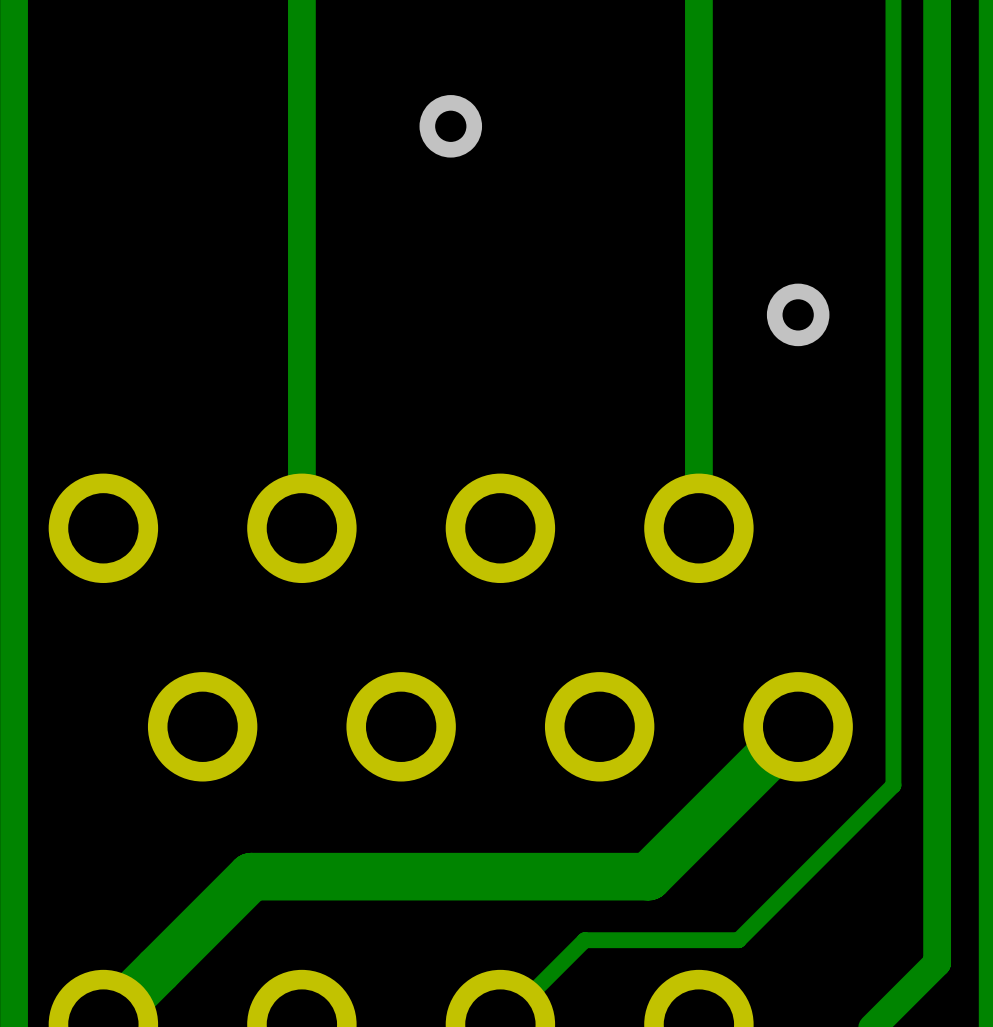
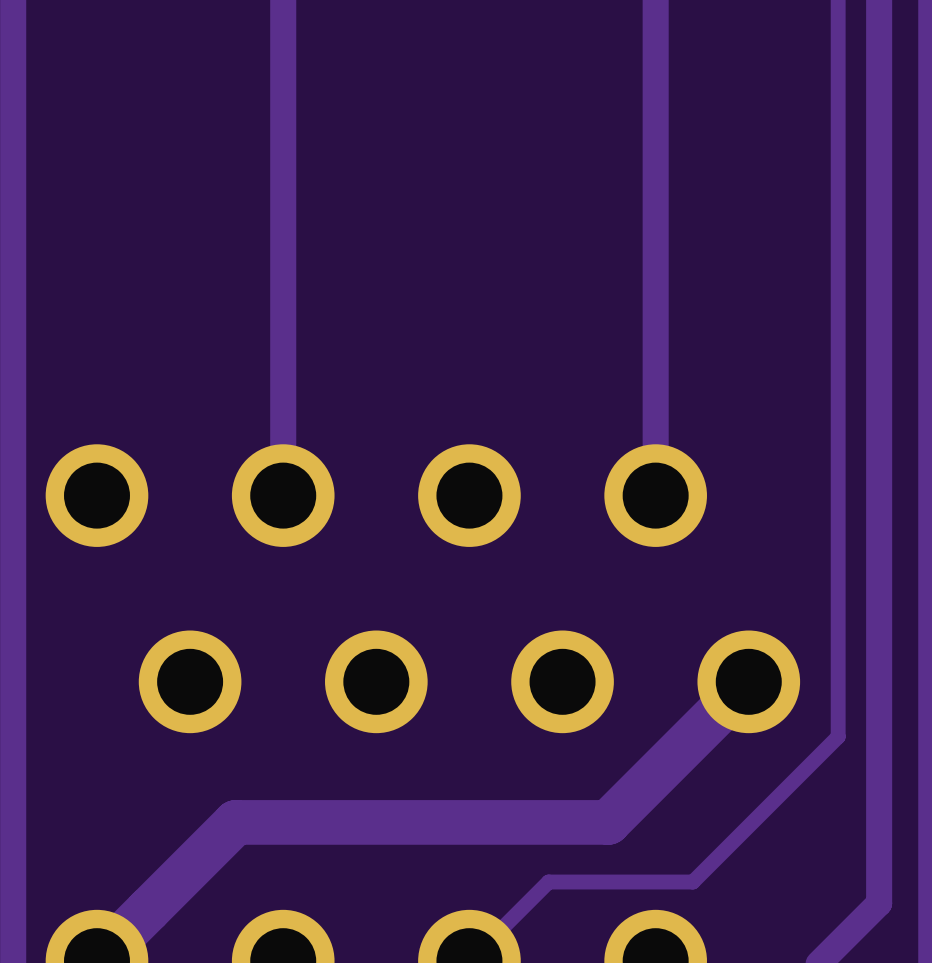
via: (450, 126) -> none
via: (798, 314) -> none

